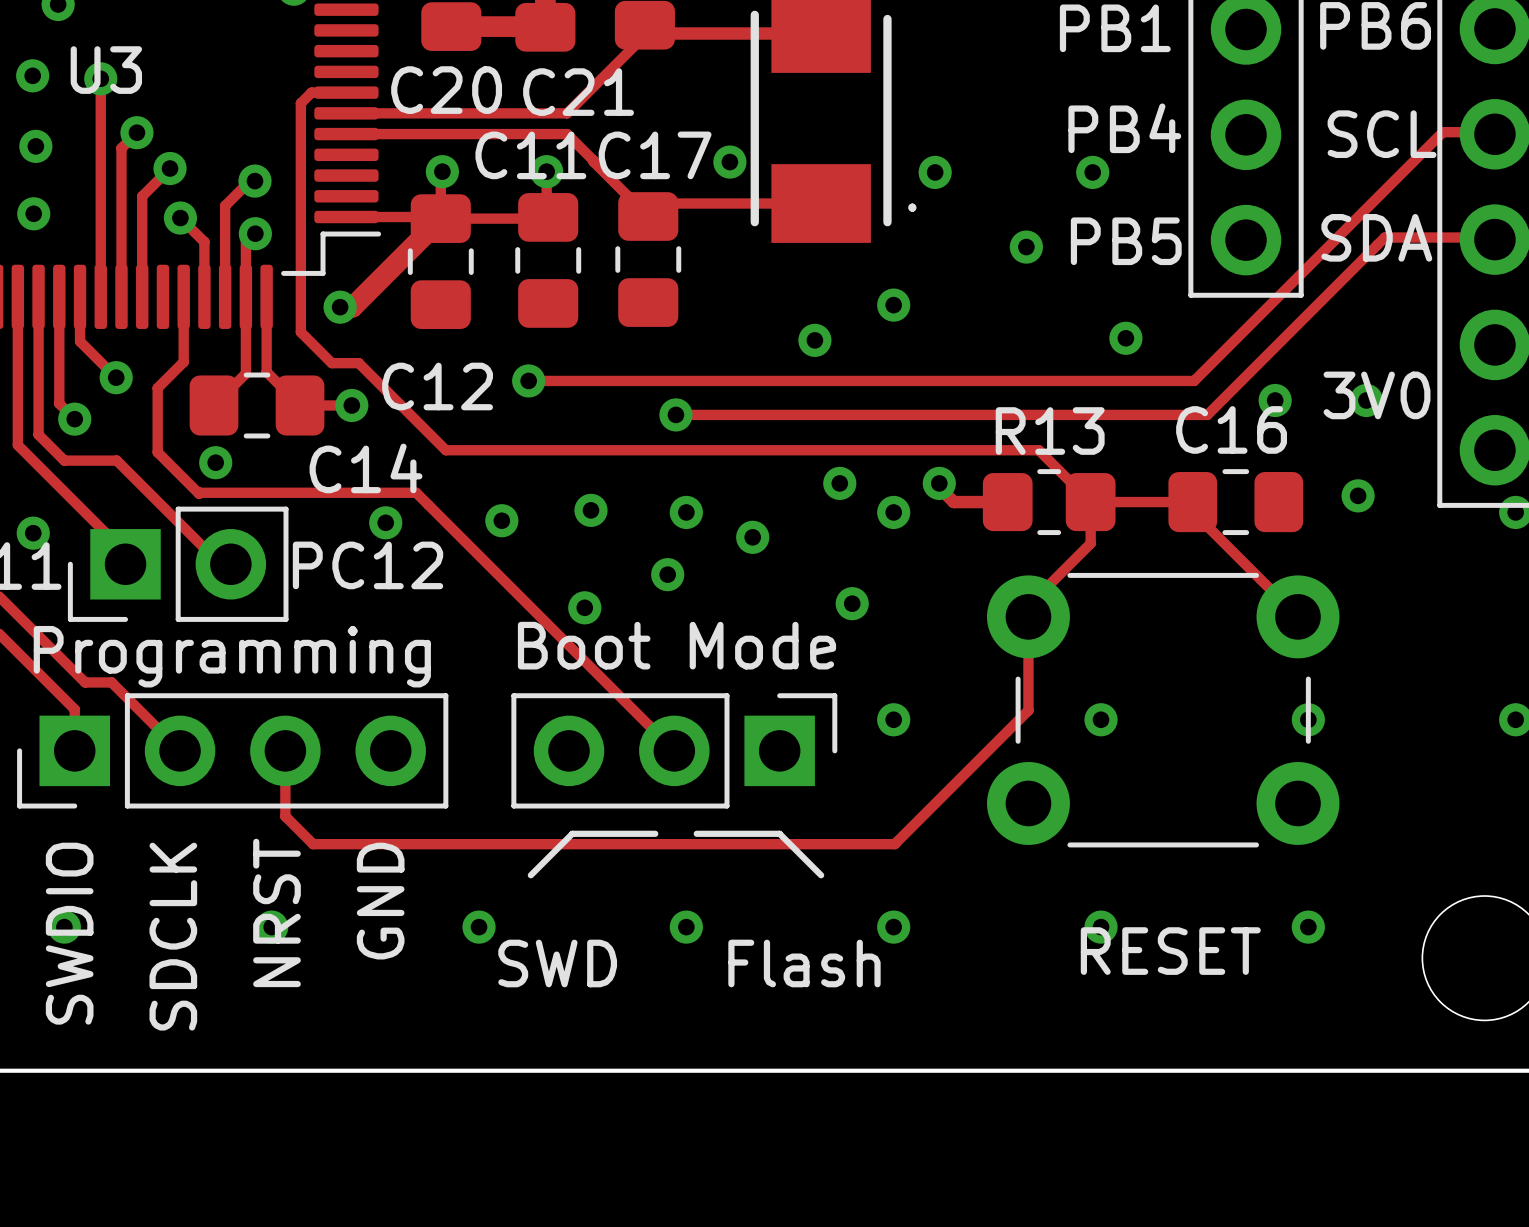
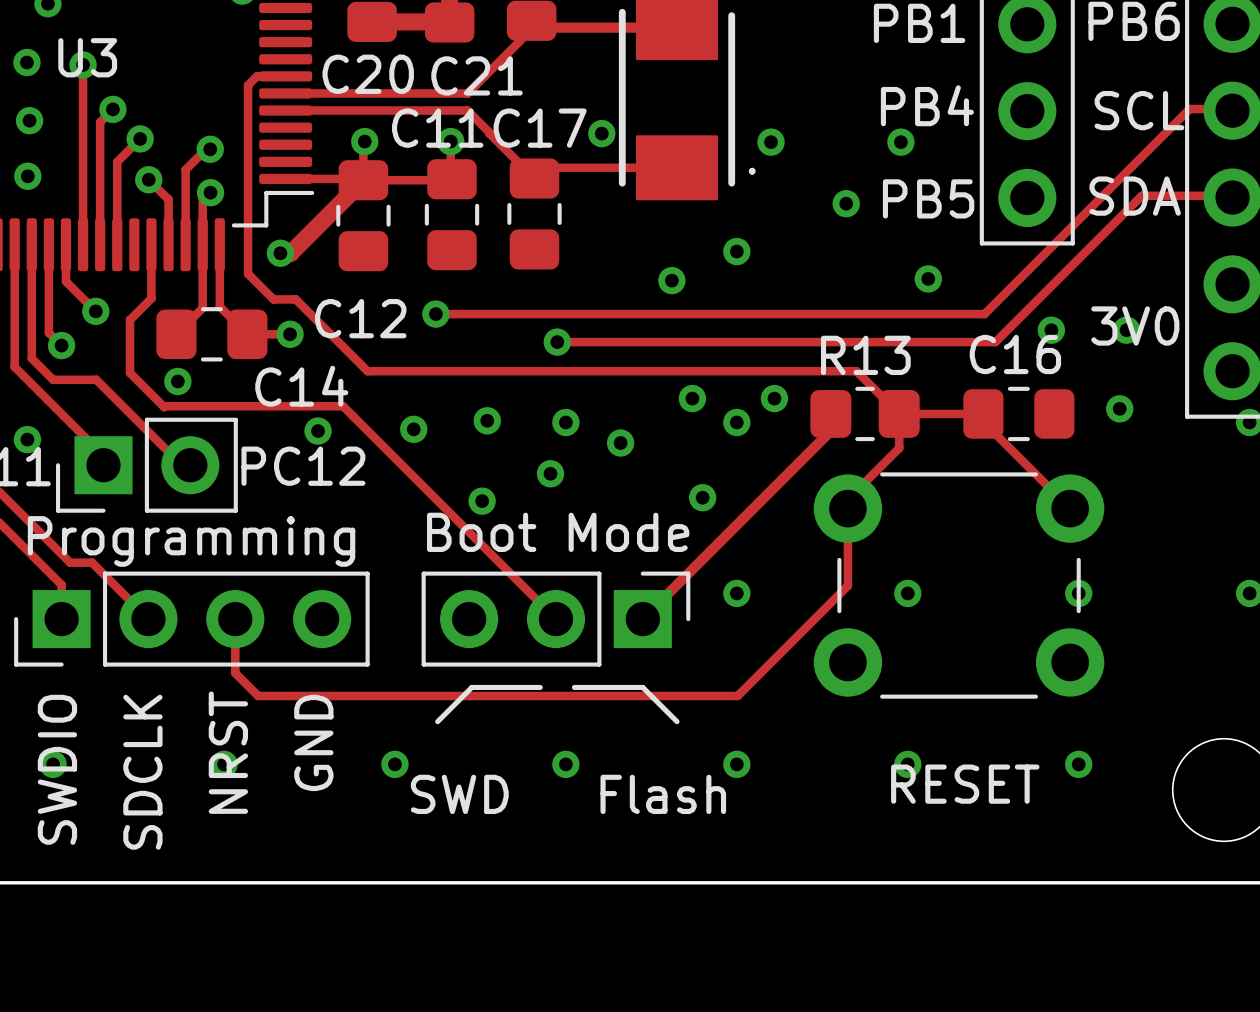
track: (939, 483) (939, 487) (953, 502) (1007, 502) -> none
track: none -> (830, 431) (642, 619)

